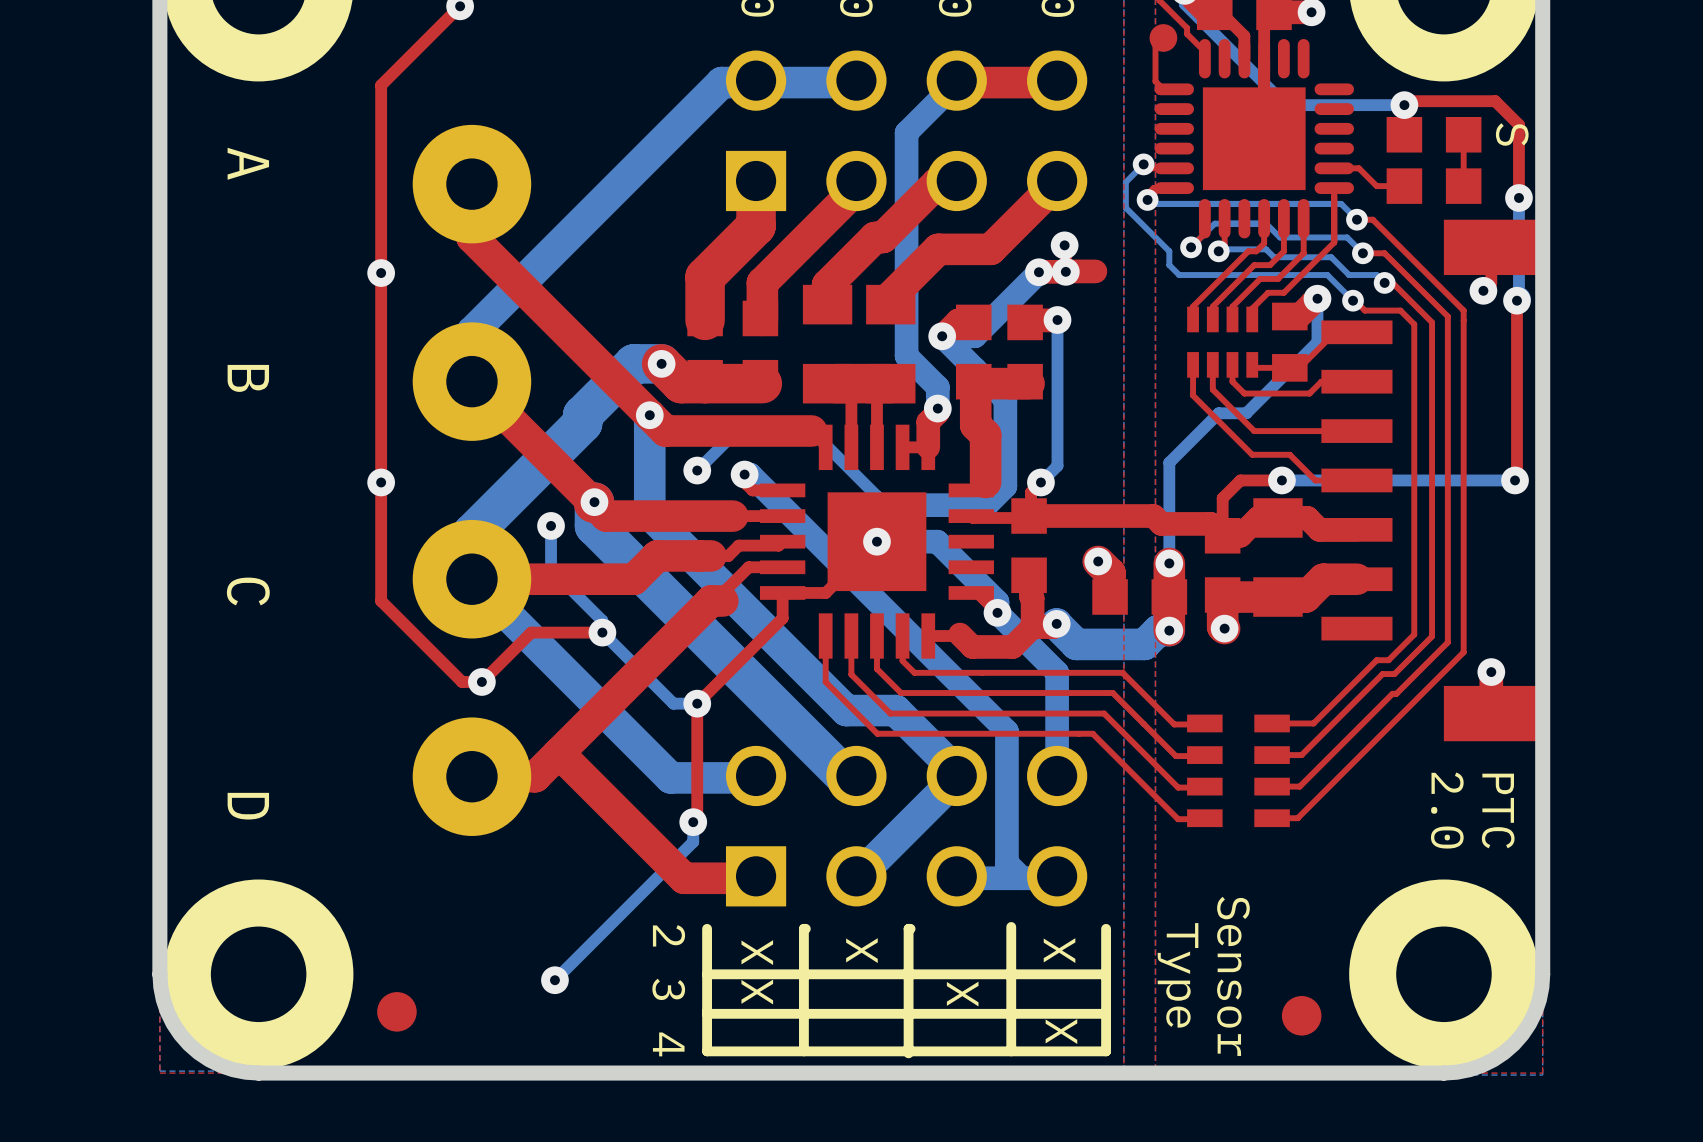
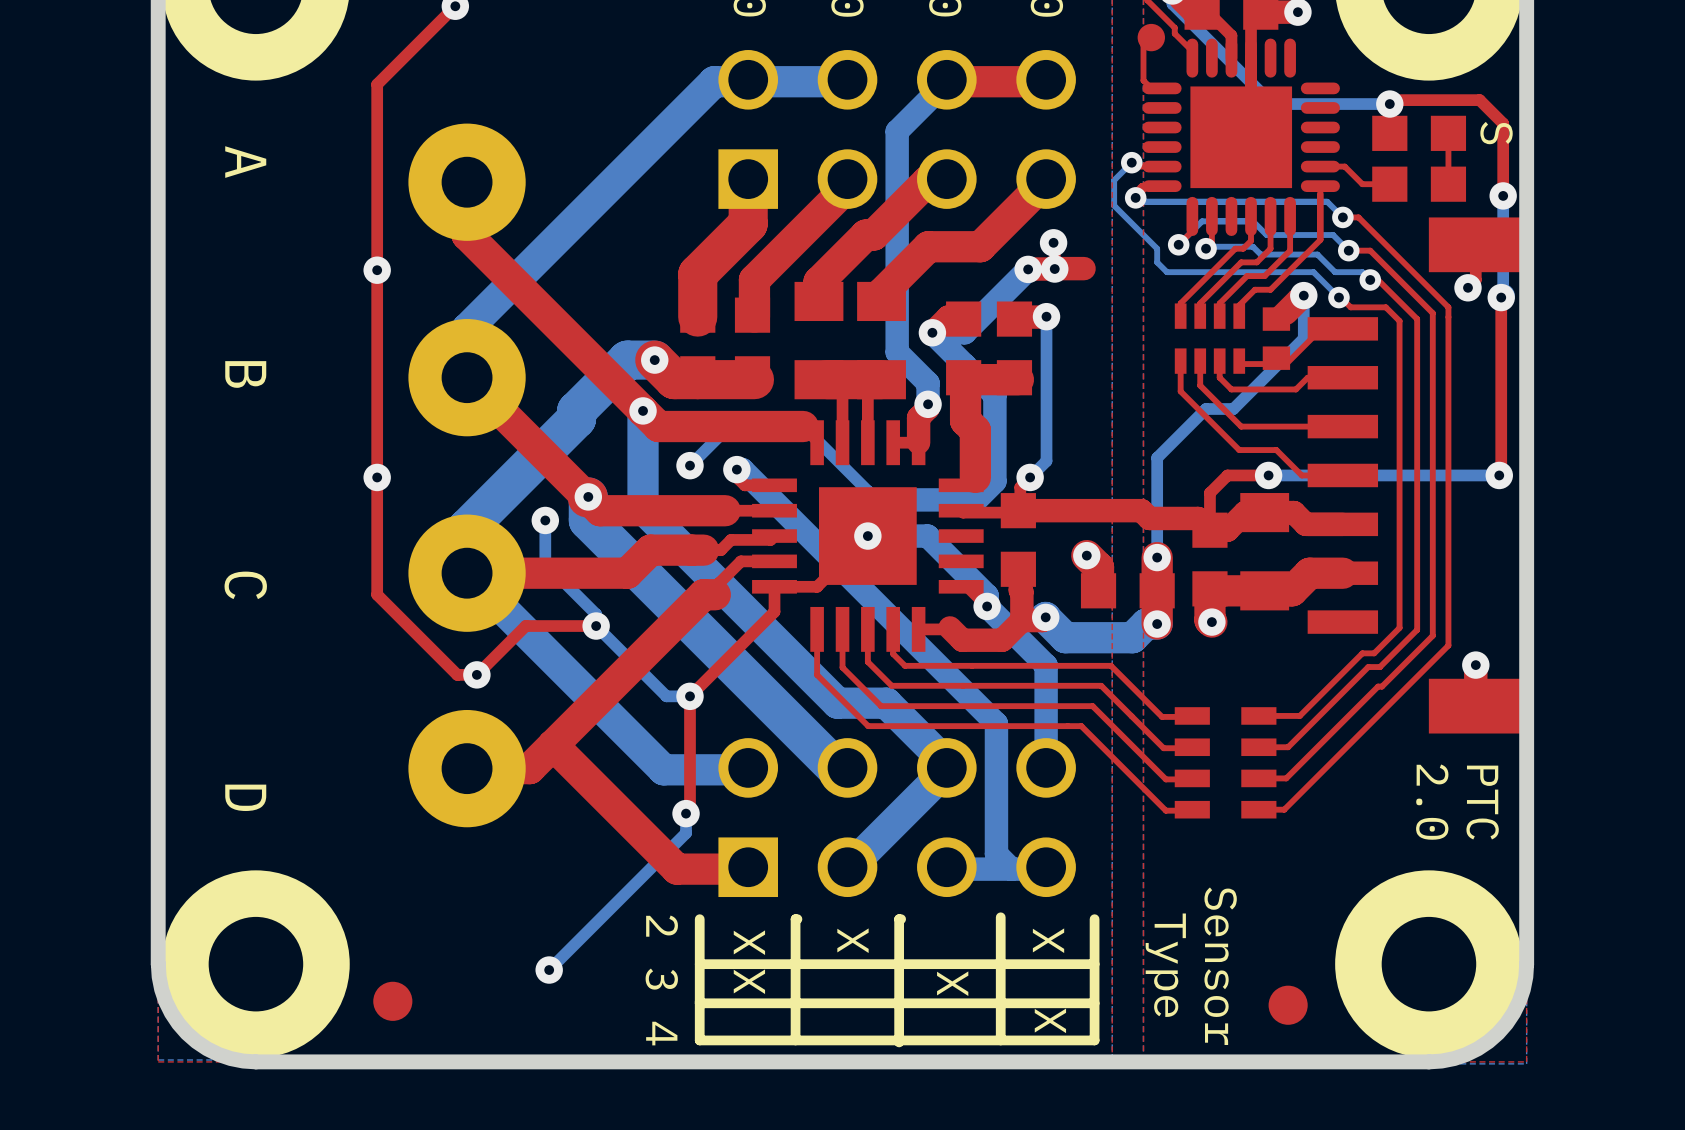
part footprint: [1272, 302, 1308, 382] -> [1262, 307, 1291, 370]

